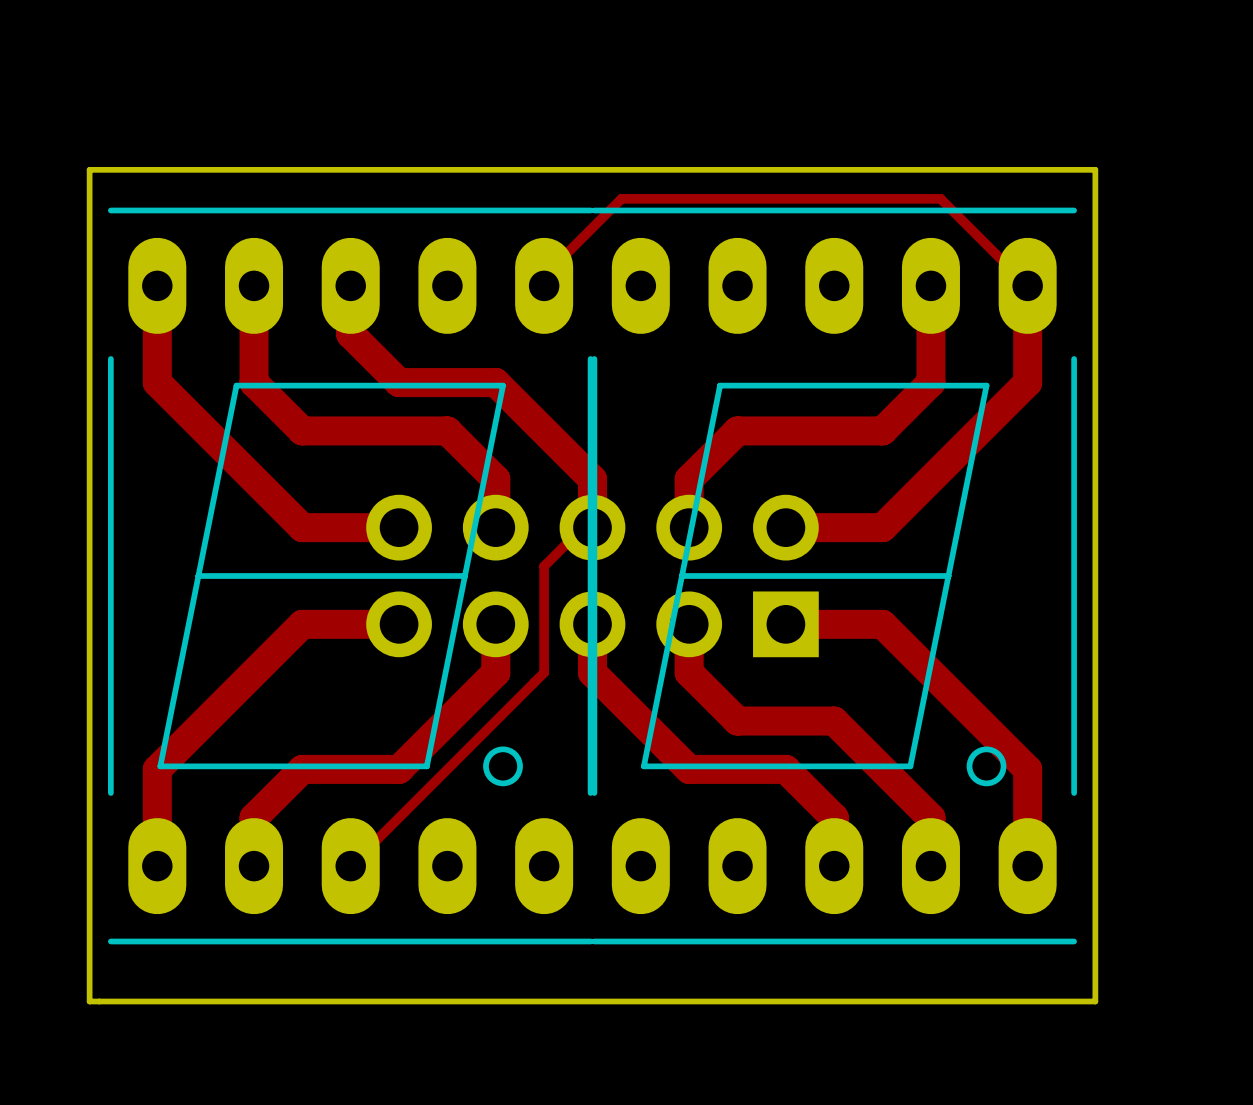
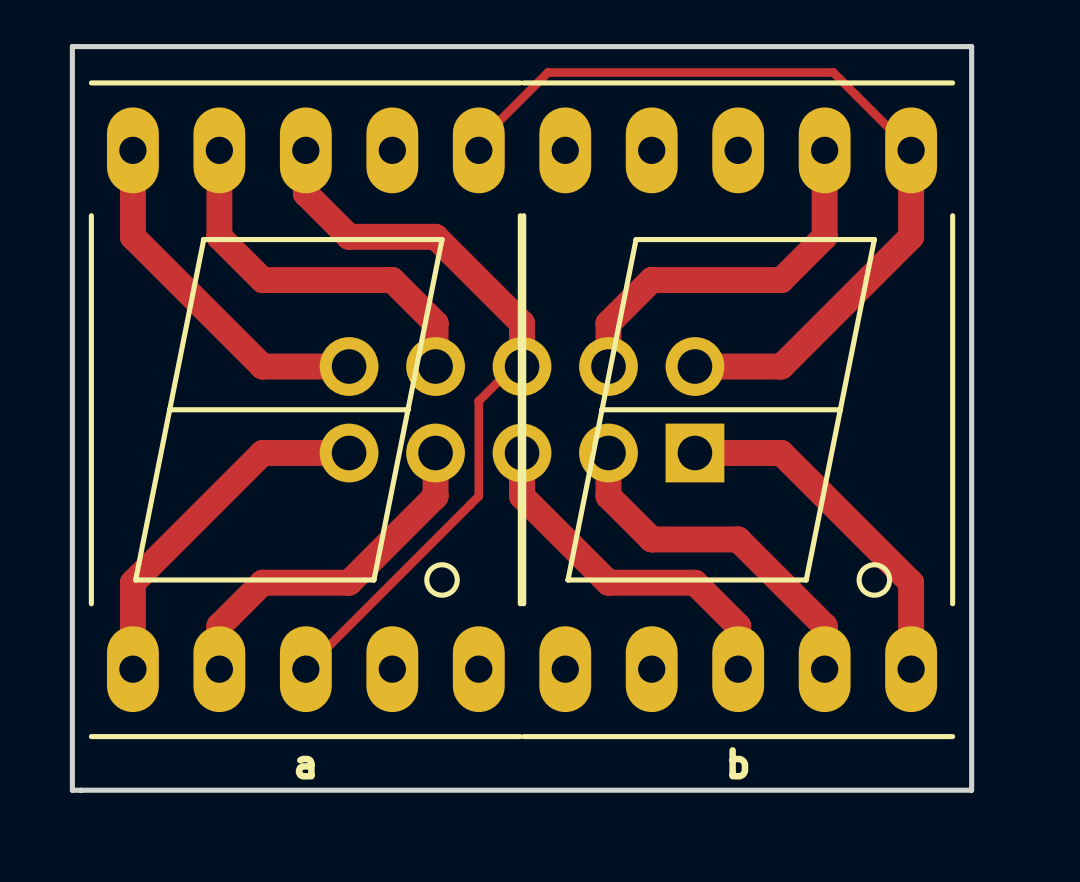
text: none -> b (738, 763)
text: none -> a (305, 767)

